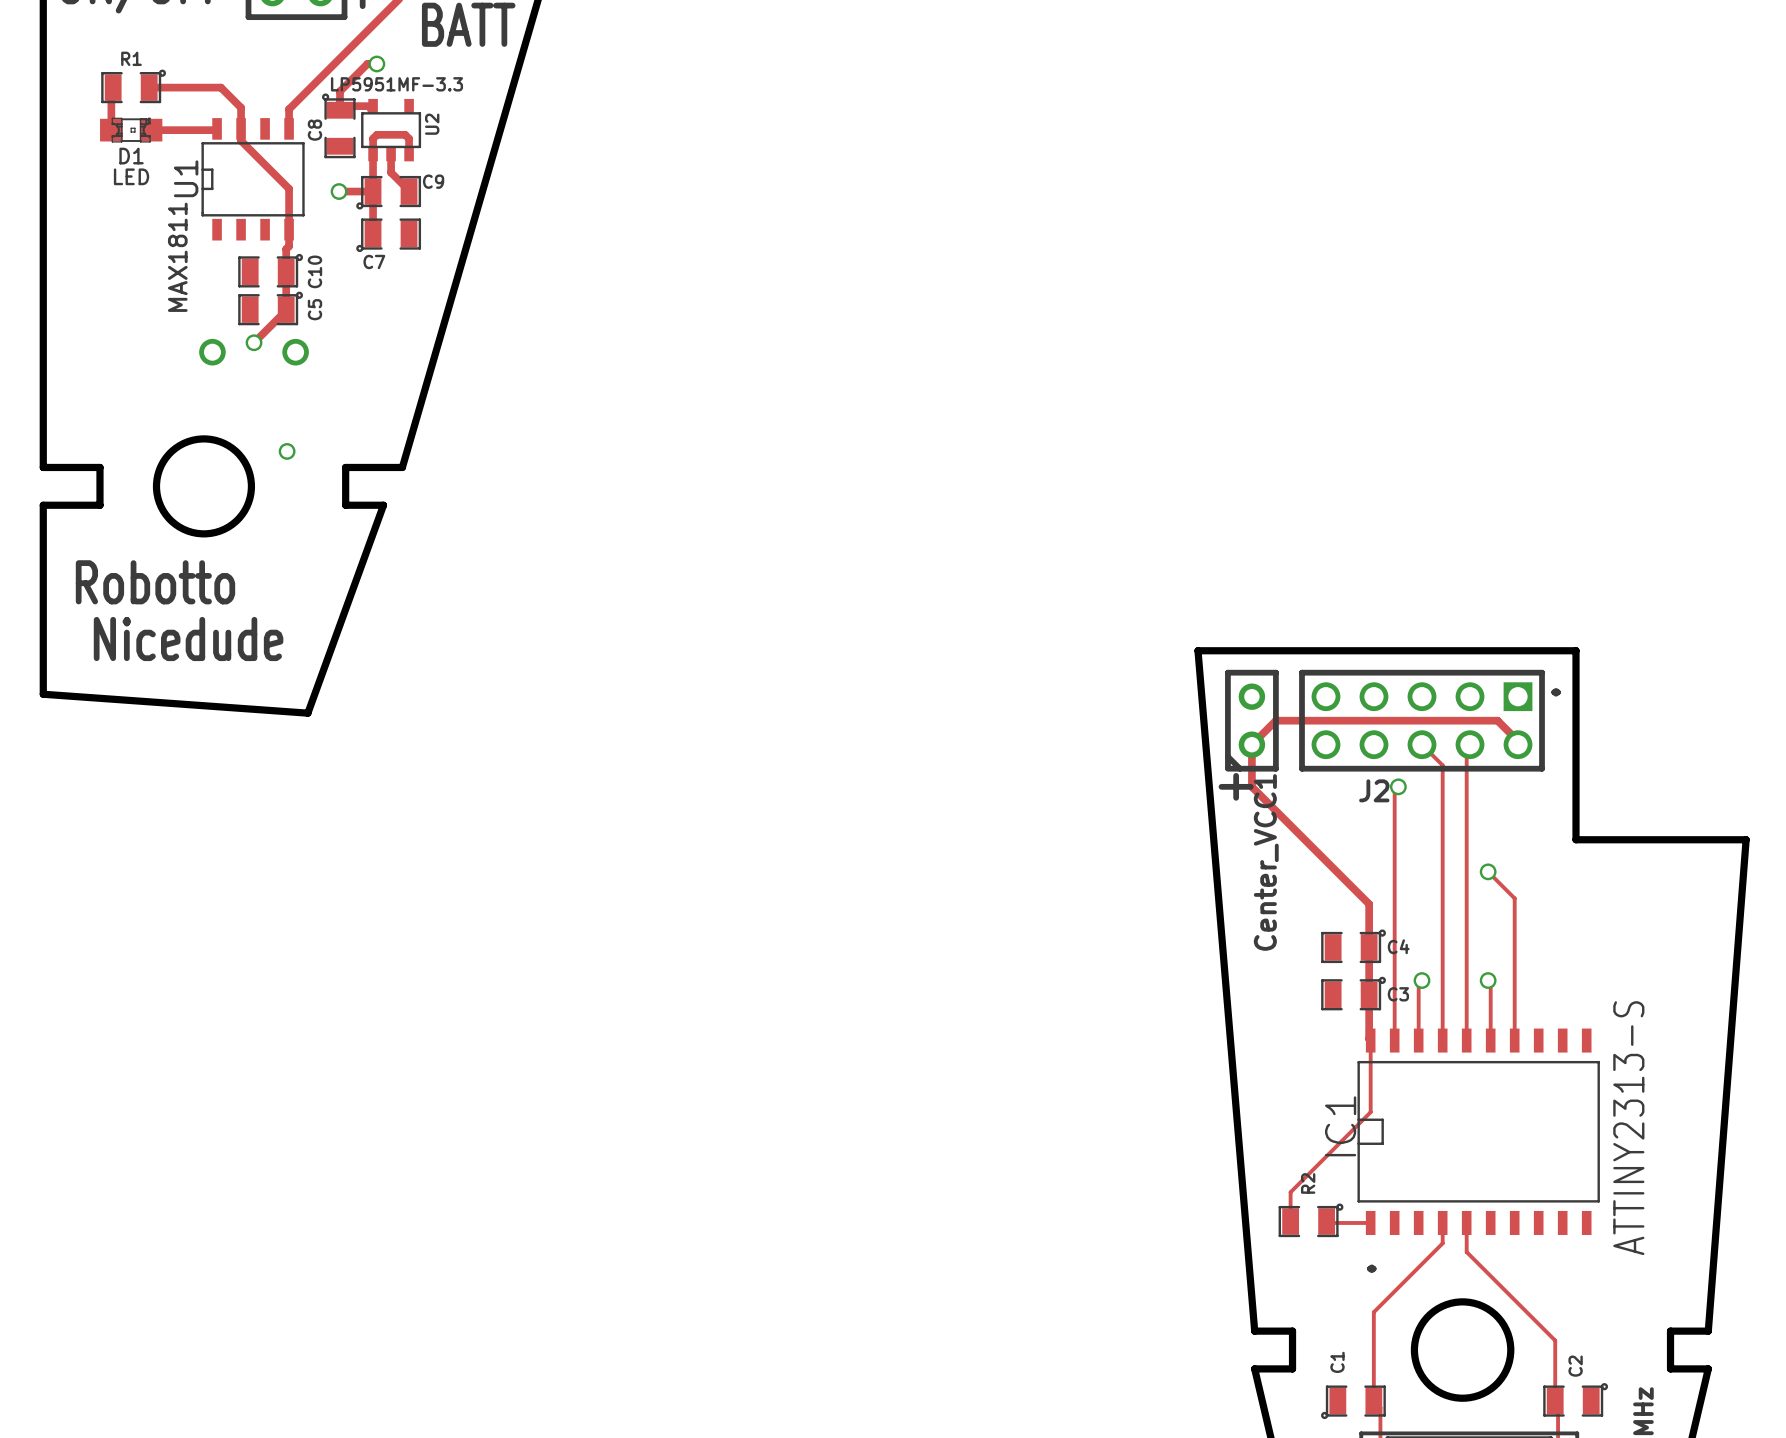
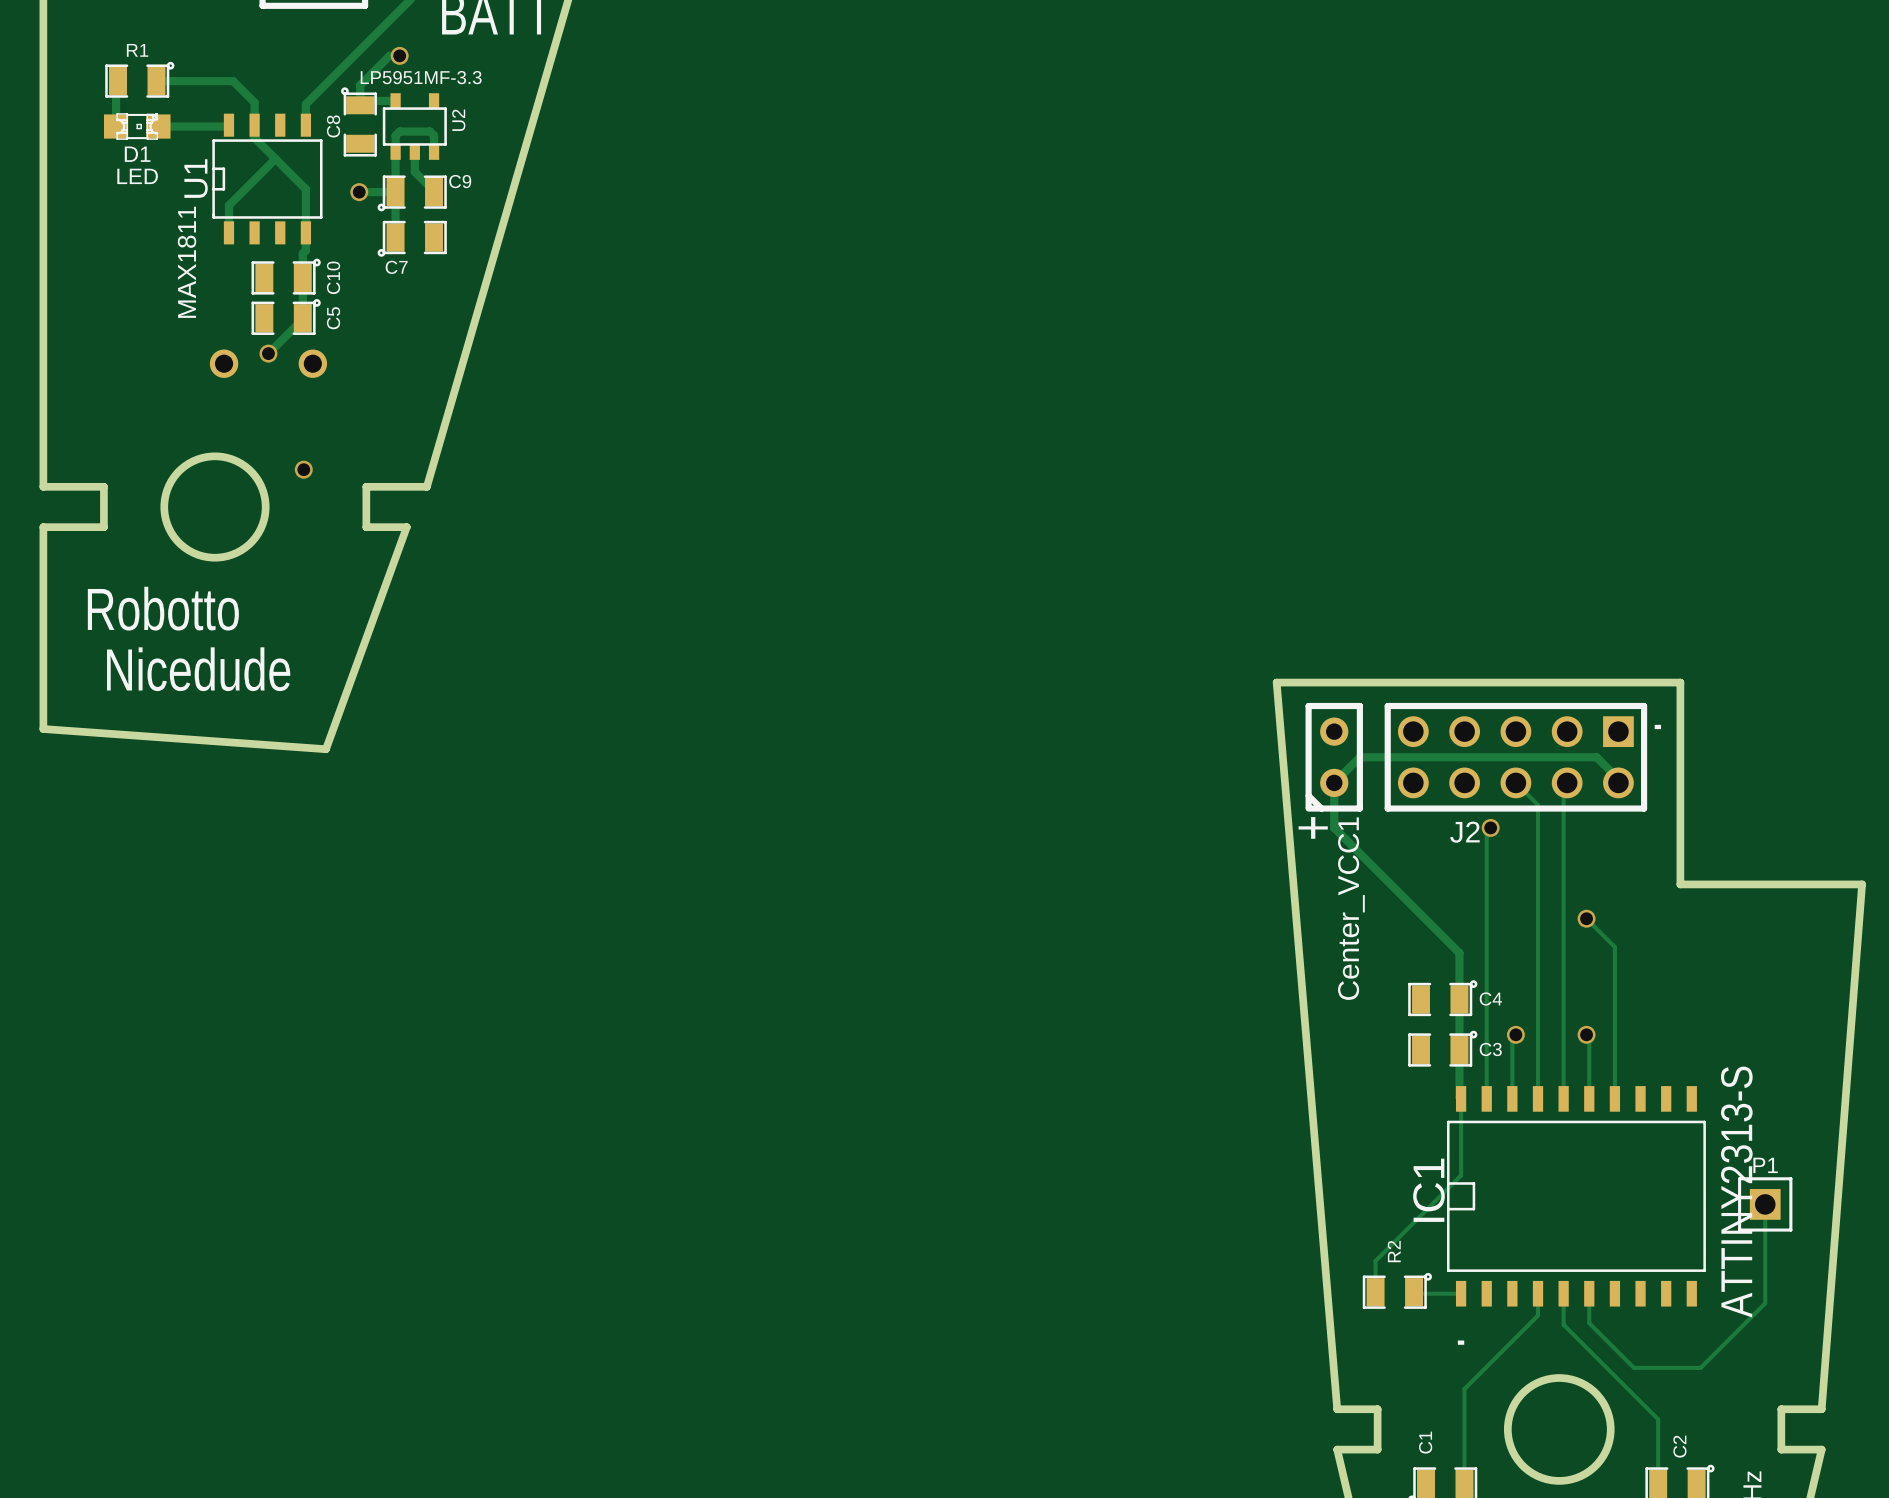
track: none -> (275, 158) (228, 205) (228, 232)
track: none -> (1765, 1204) (1765, 1303) (1700, 1367) (1634, 1367) (1589, 1323) (1589, 1293)
P1: none -> (1765, 1204)

